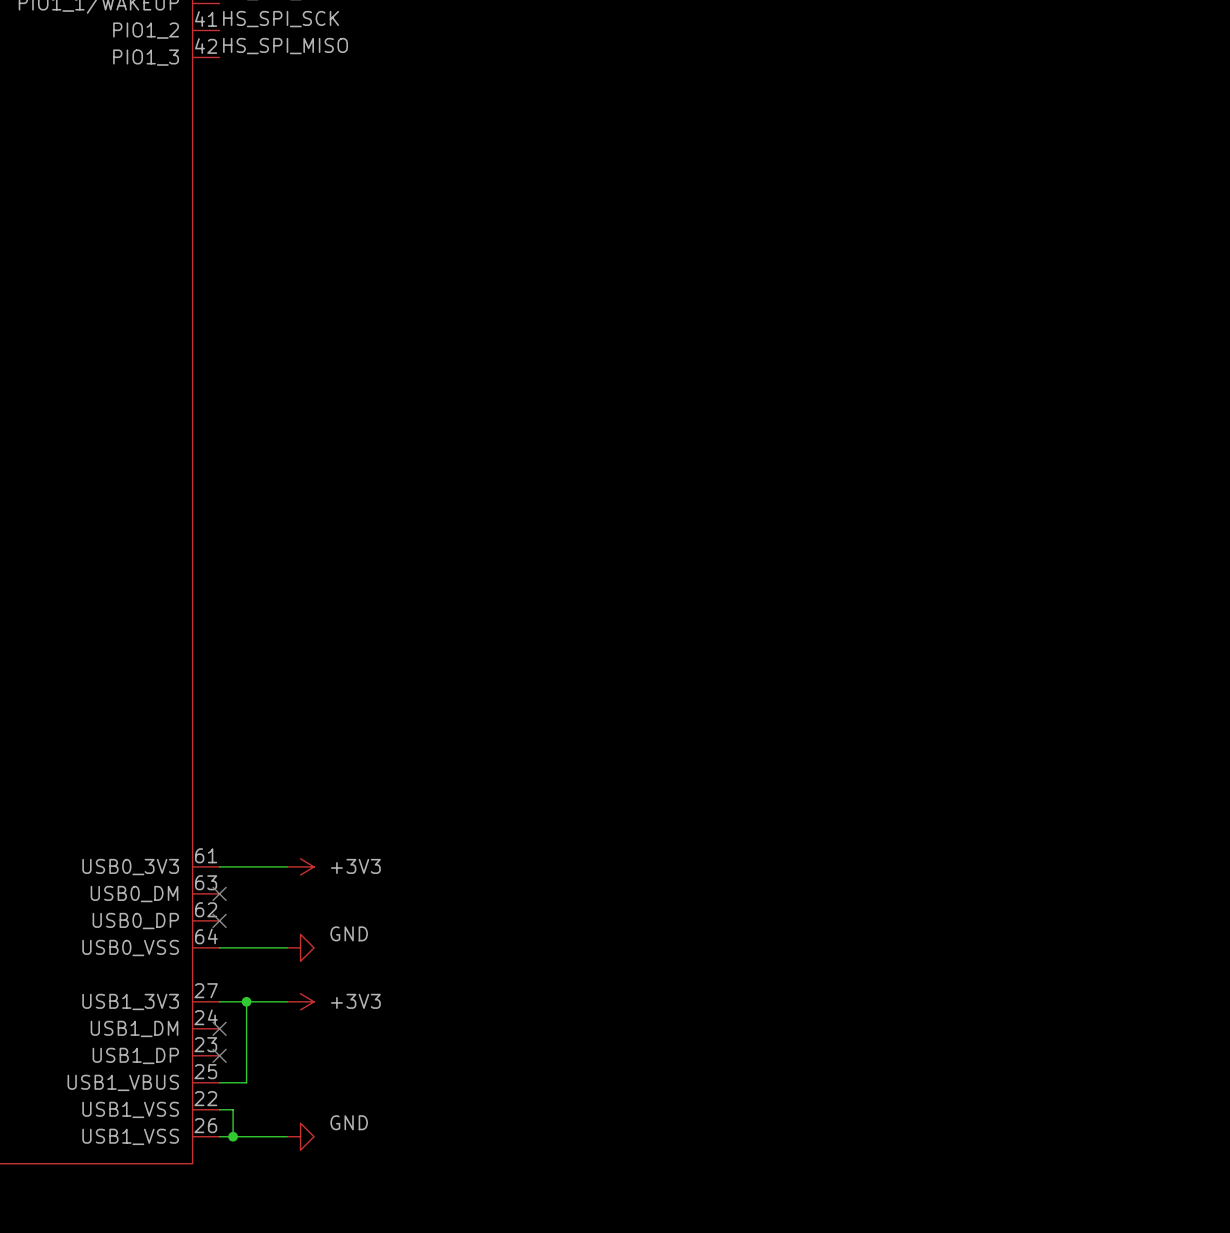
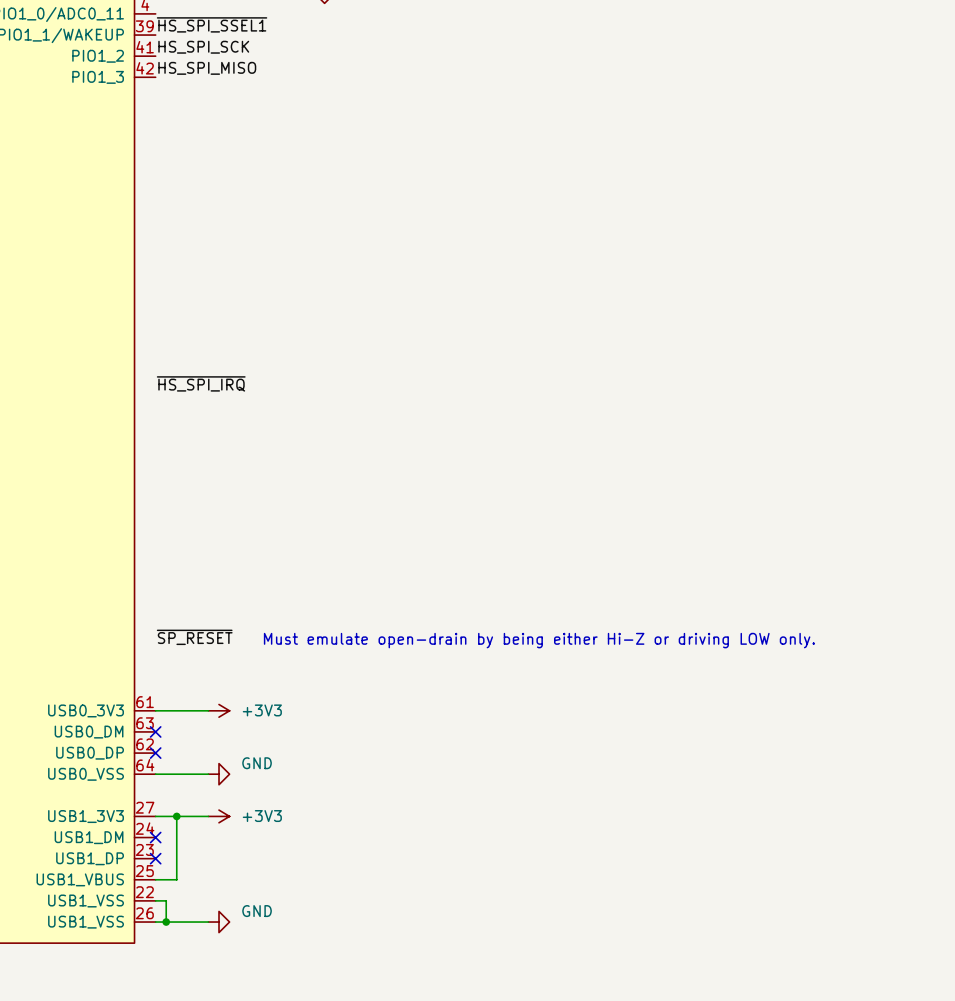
label: none -> ~{HS_SPI_IRQ} (201, 383)
label: none -> ~{SP_RESET} (194, 637)
text: none -> Must emulate open-drain by being either Hi-Z or driving LOW only. (539, 640)

